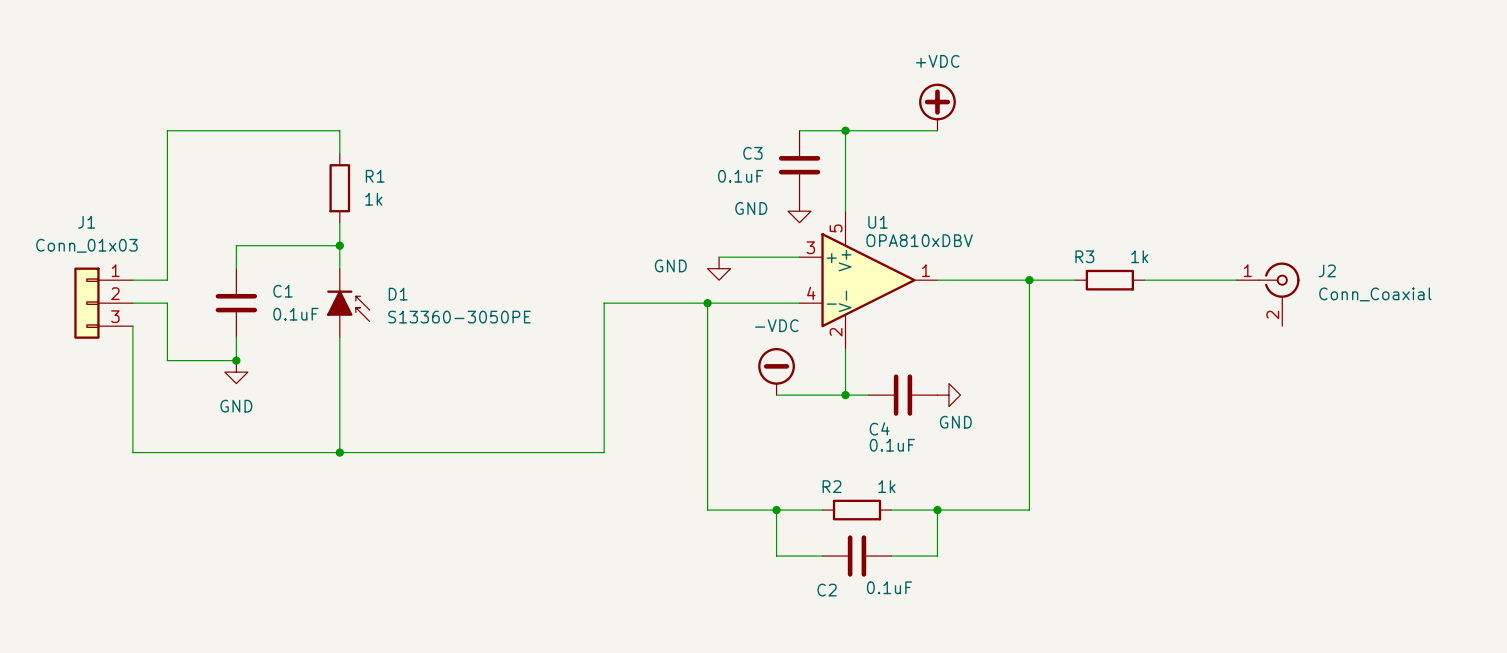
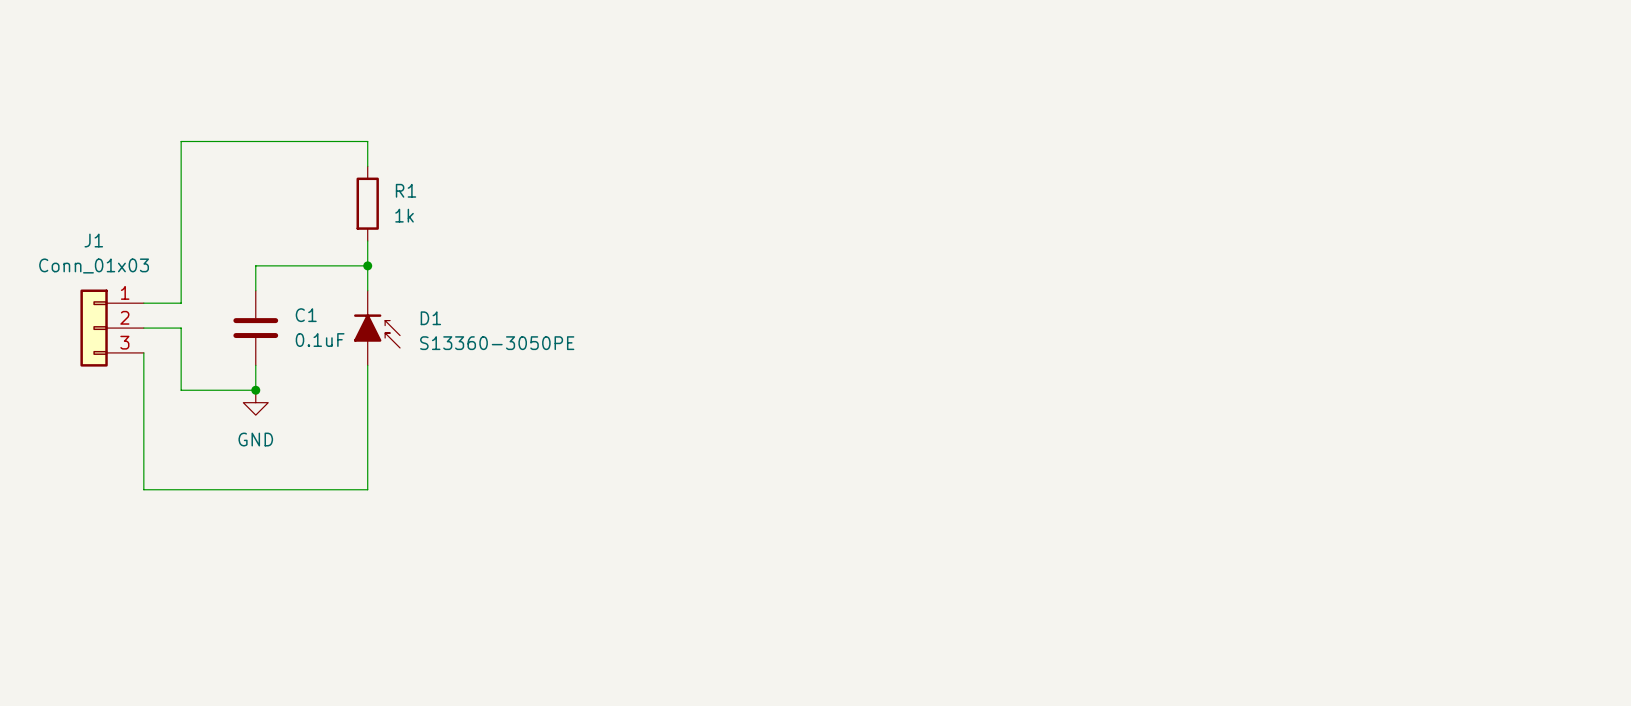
power symbol: +VDC (937, 107) -> none
wire: (799, 130) (937, 130) -> none
wire: (845, 130) (845, 211) -> none
junction: (845, 130) -> none
C3: 0.1uF (799, 165) -> none
power symbol: GND (799, 211) -> none
wire: (719, 257) (799, 257) -> none
power symbol: GND (719, 268) -> none
U1: OPA810xDBV (868, 280) -> none
wire: (937, 280) (1075, 280) -> none
wire: (1029, 280) (1029, 510) (891, 510) -> none
junction: (1029, 280) -> none
R3: 1k (1109, 280) -> none
wire: (1144, 280) (1236, 280) -> none
J2: Conn_Coaxial (1267, 294) -> none
wire: (707, 303) (707, 510) (822, 510) -> none
junction: (707, 303) -> none
wire: (799, 303) (604, 303) (604, 452) (339, 452) -> none
wire: (845, 349) (845, 395) -> none
power symbol: -VDC (776, 371) -> none
wire: (776, 395) (868, 395) -> none
junction: (845, 395) -> none
C4: 0.1uF (902, 395) -> none
power symbol: GND (948, 395) -> none
junction: (339, 452) -> none
wire: (776, 510) (776, 556) (822, 556) -> none
junction: (776, 510) -> none
R2: 1k (857, 510) -> none
wire: (937, 510) (937, 556) (891, 556) -> none
junction: (937, 510) -> none
C2: 0.1uF (857, 556) -> none

